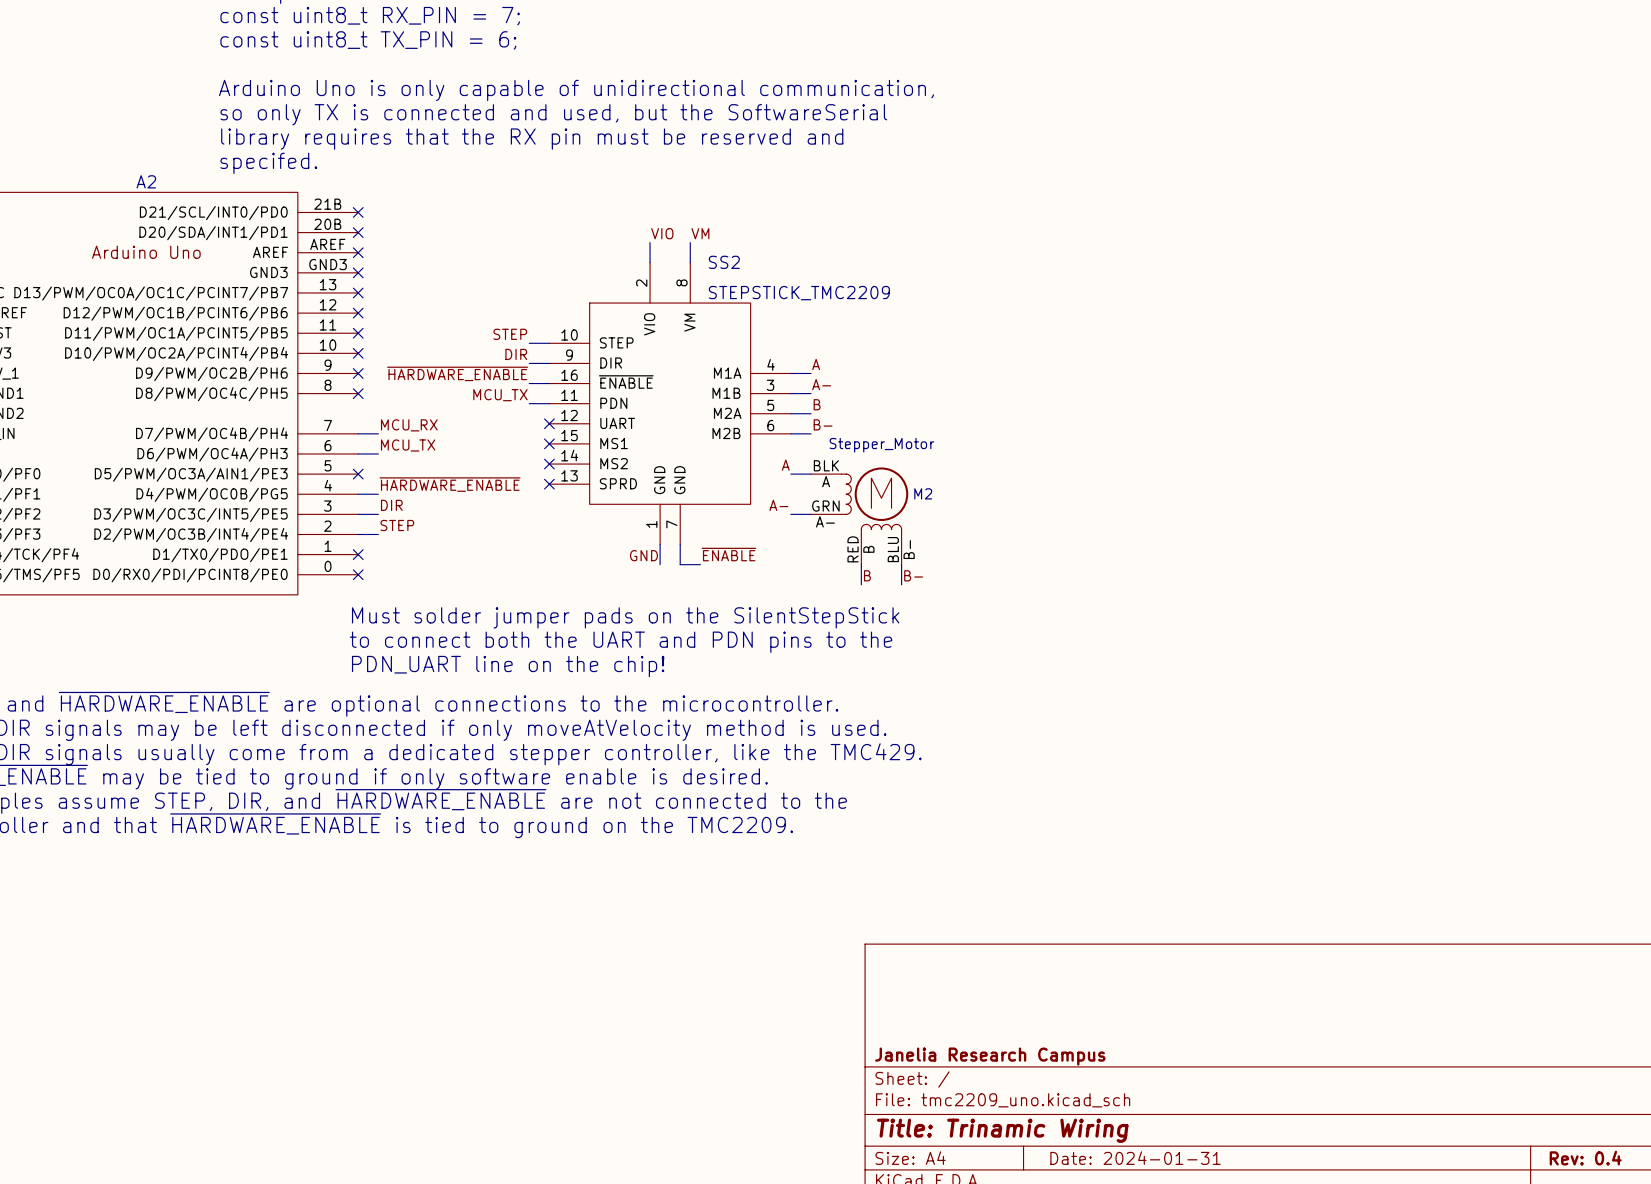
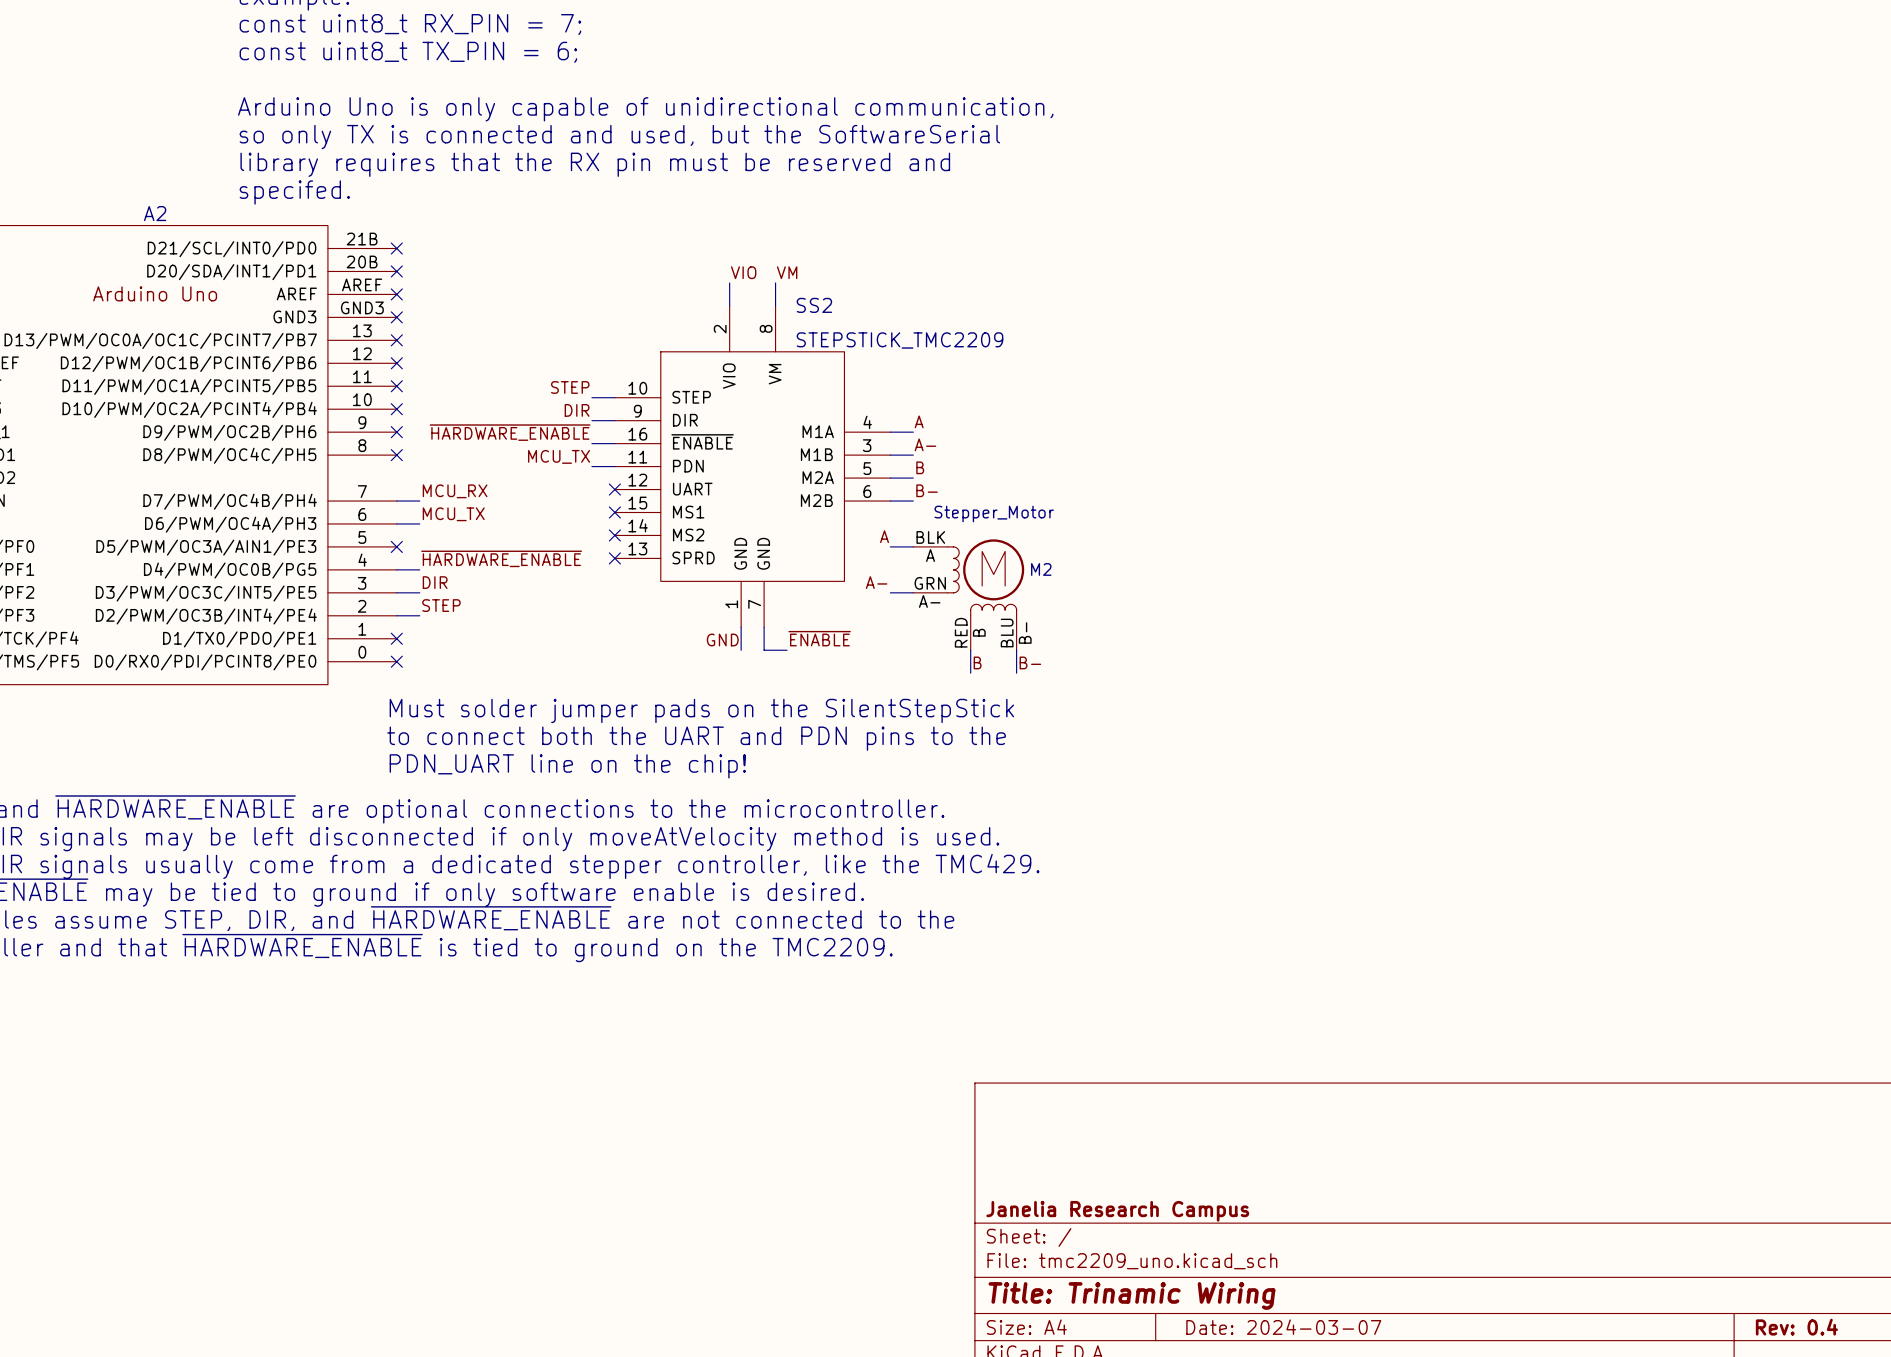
title block: Date: 2024-01-31 (1135, 1158) -> Date: 2024-03-07 (1283, 1327)

